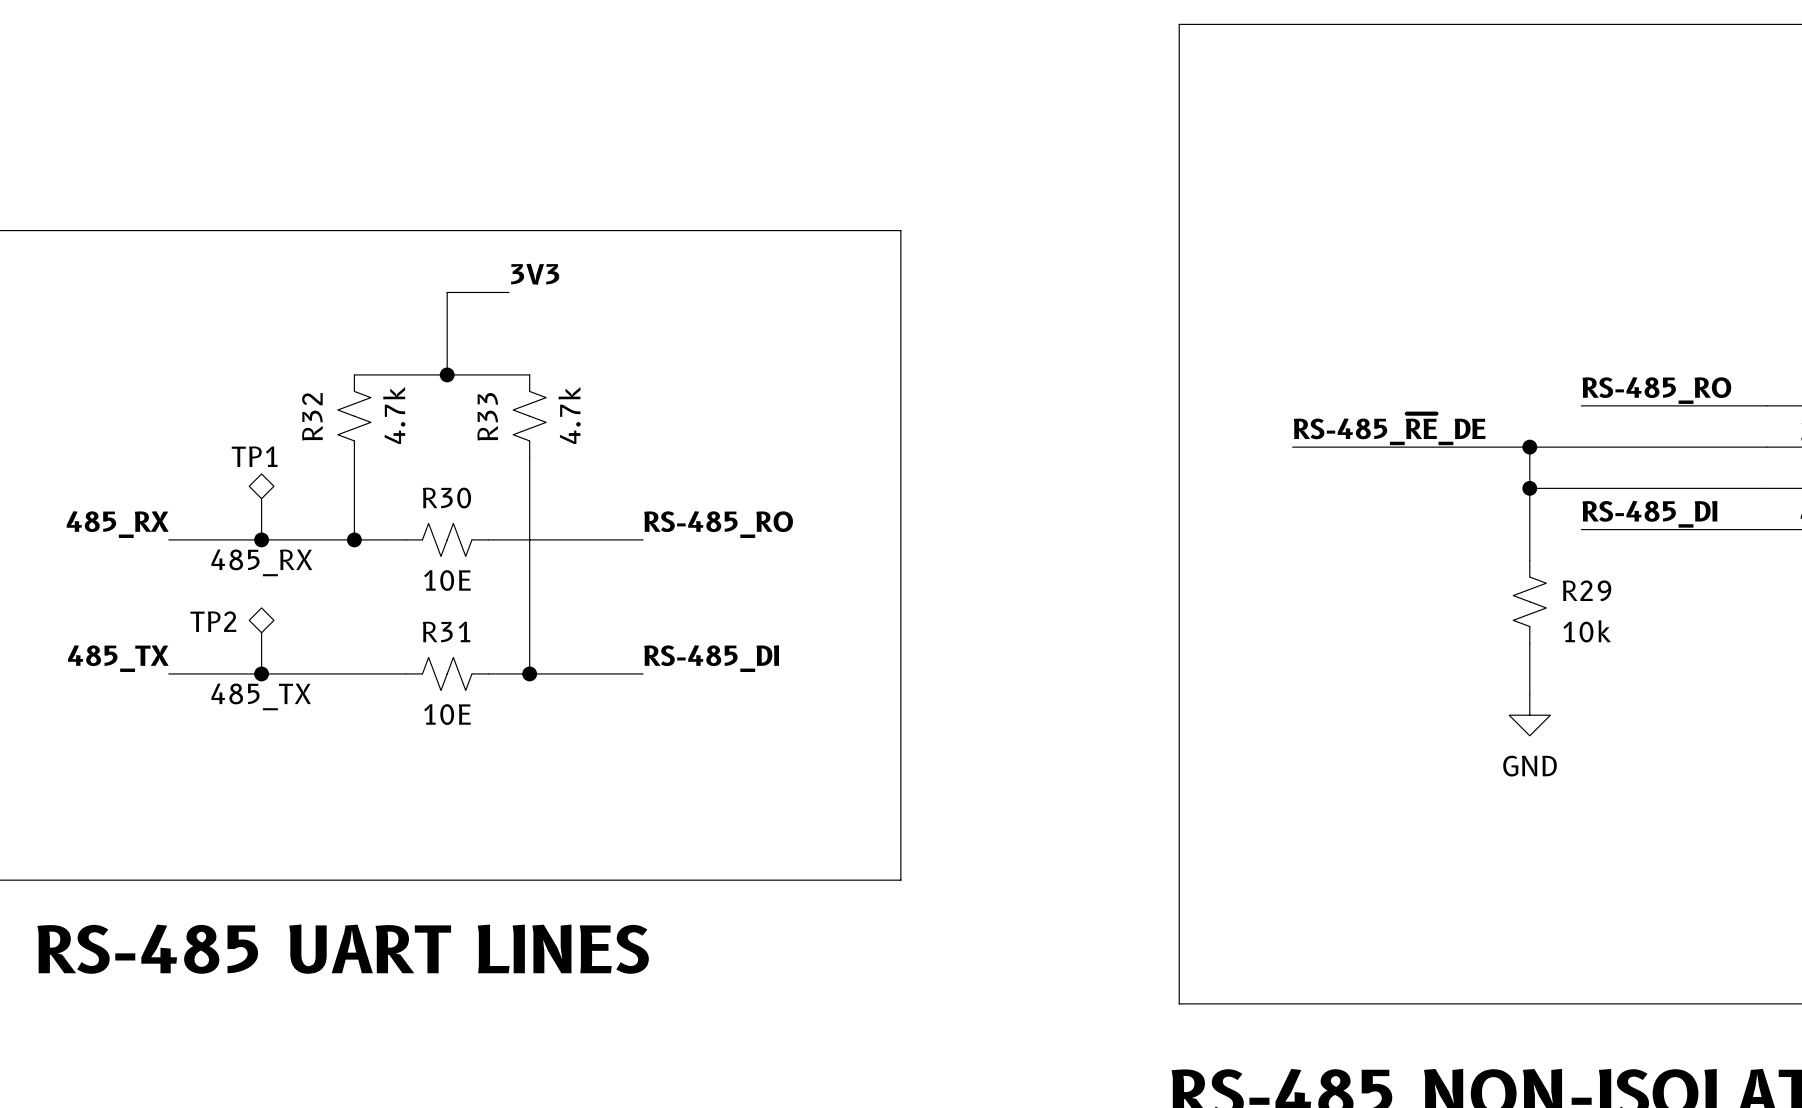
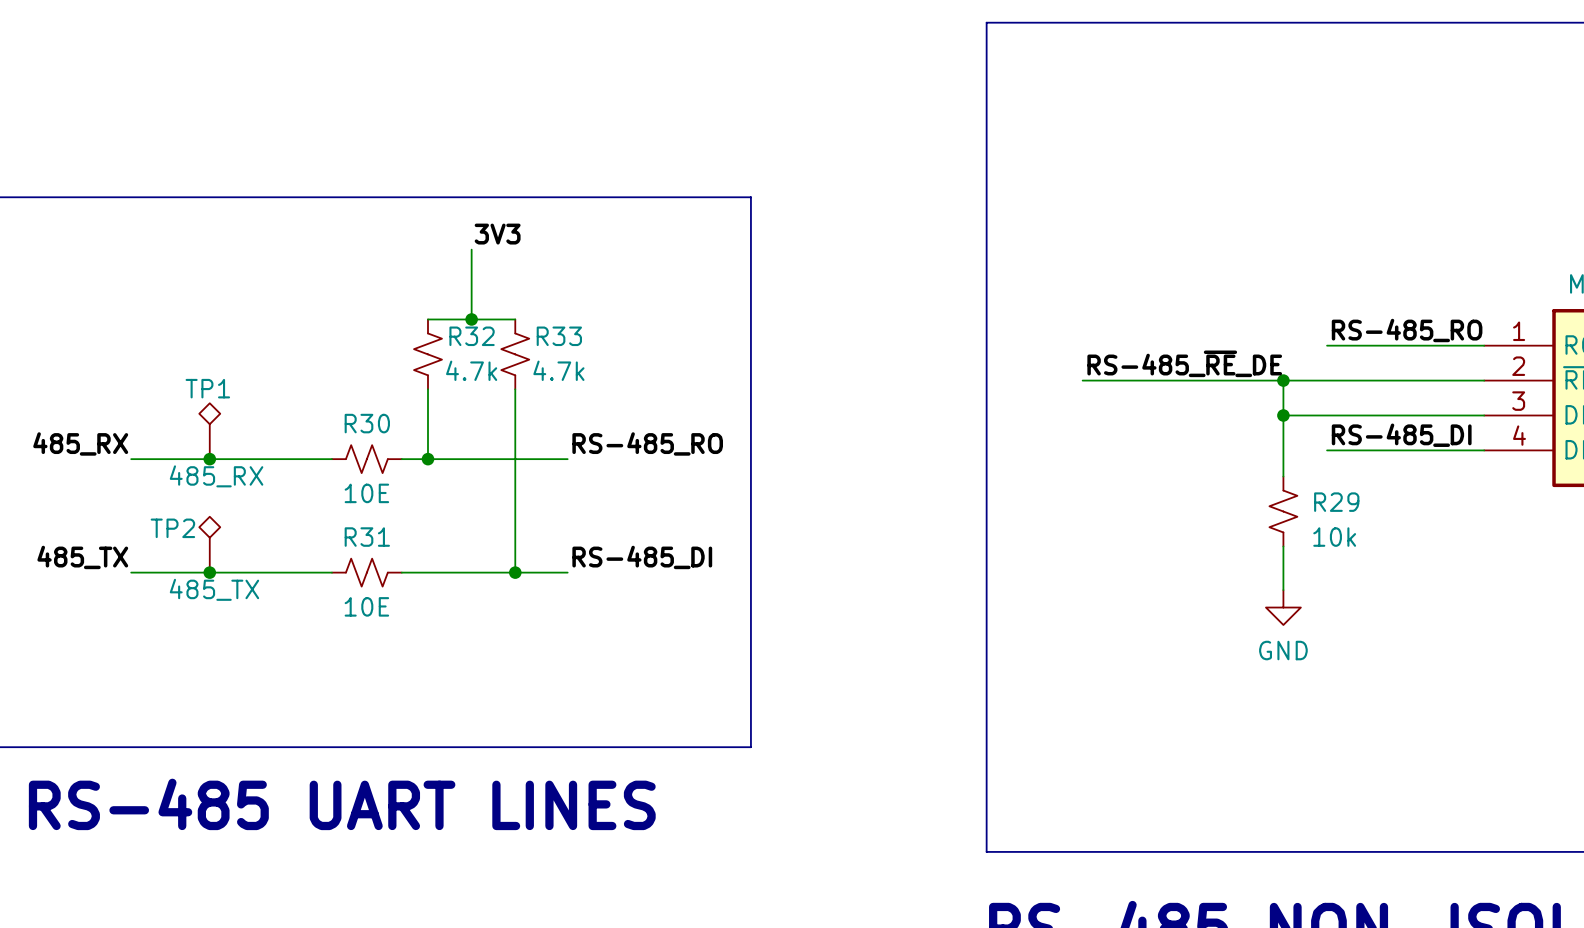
label position: 3V3 (535, 274) -> 3V3 (497, 234)
wire: (509, 292) (447, 292) (447, 374) -> none
wire: none -> (471, 249) (471, 319)
wire: (354, 374) (519, 374) -> none
junction: (447, 374) -> none
wire: none -> (436, 319) (515, 319)
junction: none -> (471, 319)
R32 value rotation: 0° (394, 415) -> 90° clockwise (471, 370)
R33 value rotation: 0° (569, 415) -> 90° clockwise (558, 370)
R32 name rotation: 0° (312, 416) -> 90° clockwise (472, 336)
R32 name position: R32 (312, 416) -> R32 (472, 336)
R32 position: (354, 416) -> (427, 354)
R33 name rotation: 0° (487, 416) -> 90° clockwise (559, 336)
R33 name position: R33 (487, 416) -> R33 (559, 336)
R33 position: (529, 416) -> (515, 354)
wire: (354, 457) (354, 539) -> (427, 389) (427, 459)
wire: (529, 457) (529, 673) -> (515, 389) (515, 572)
label position: RS-485_RO (718, 524) -> RS-485_RO (647, 443)
junction: (354, 539) -> none
junction: none -> (427, 459)
wire: none -> (532, 459) (567, 459)
label position: RS-485_DI (711, 658) -> RS-485_DI (642, 557)
junction: (529, 673) -> none
junction: none -> (515, 572)
wire: none -> (532, 572) (567, 572)

